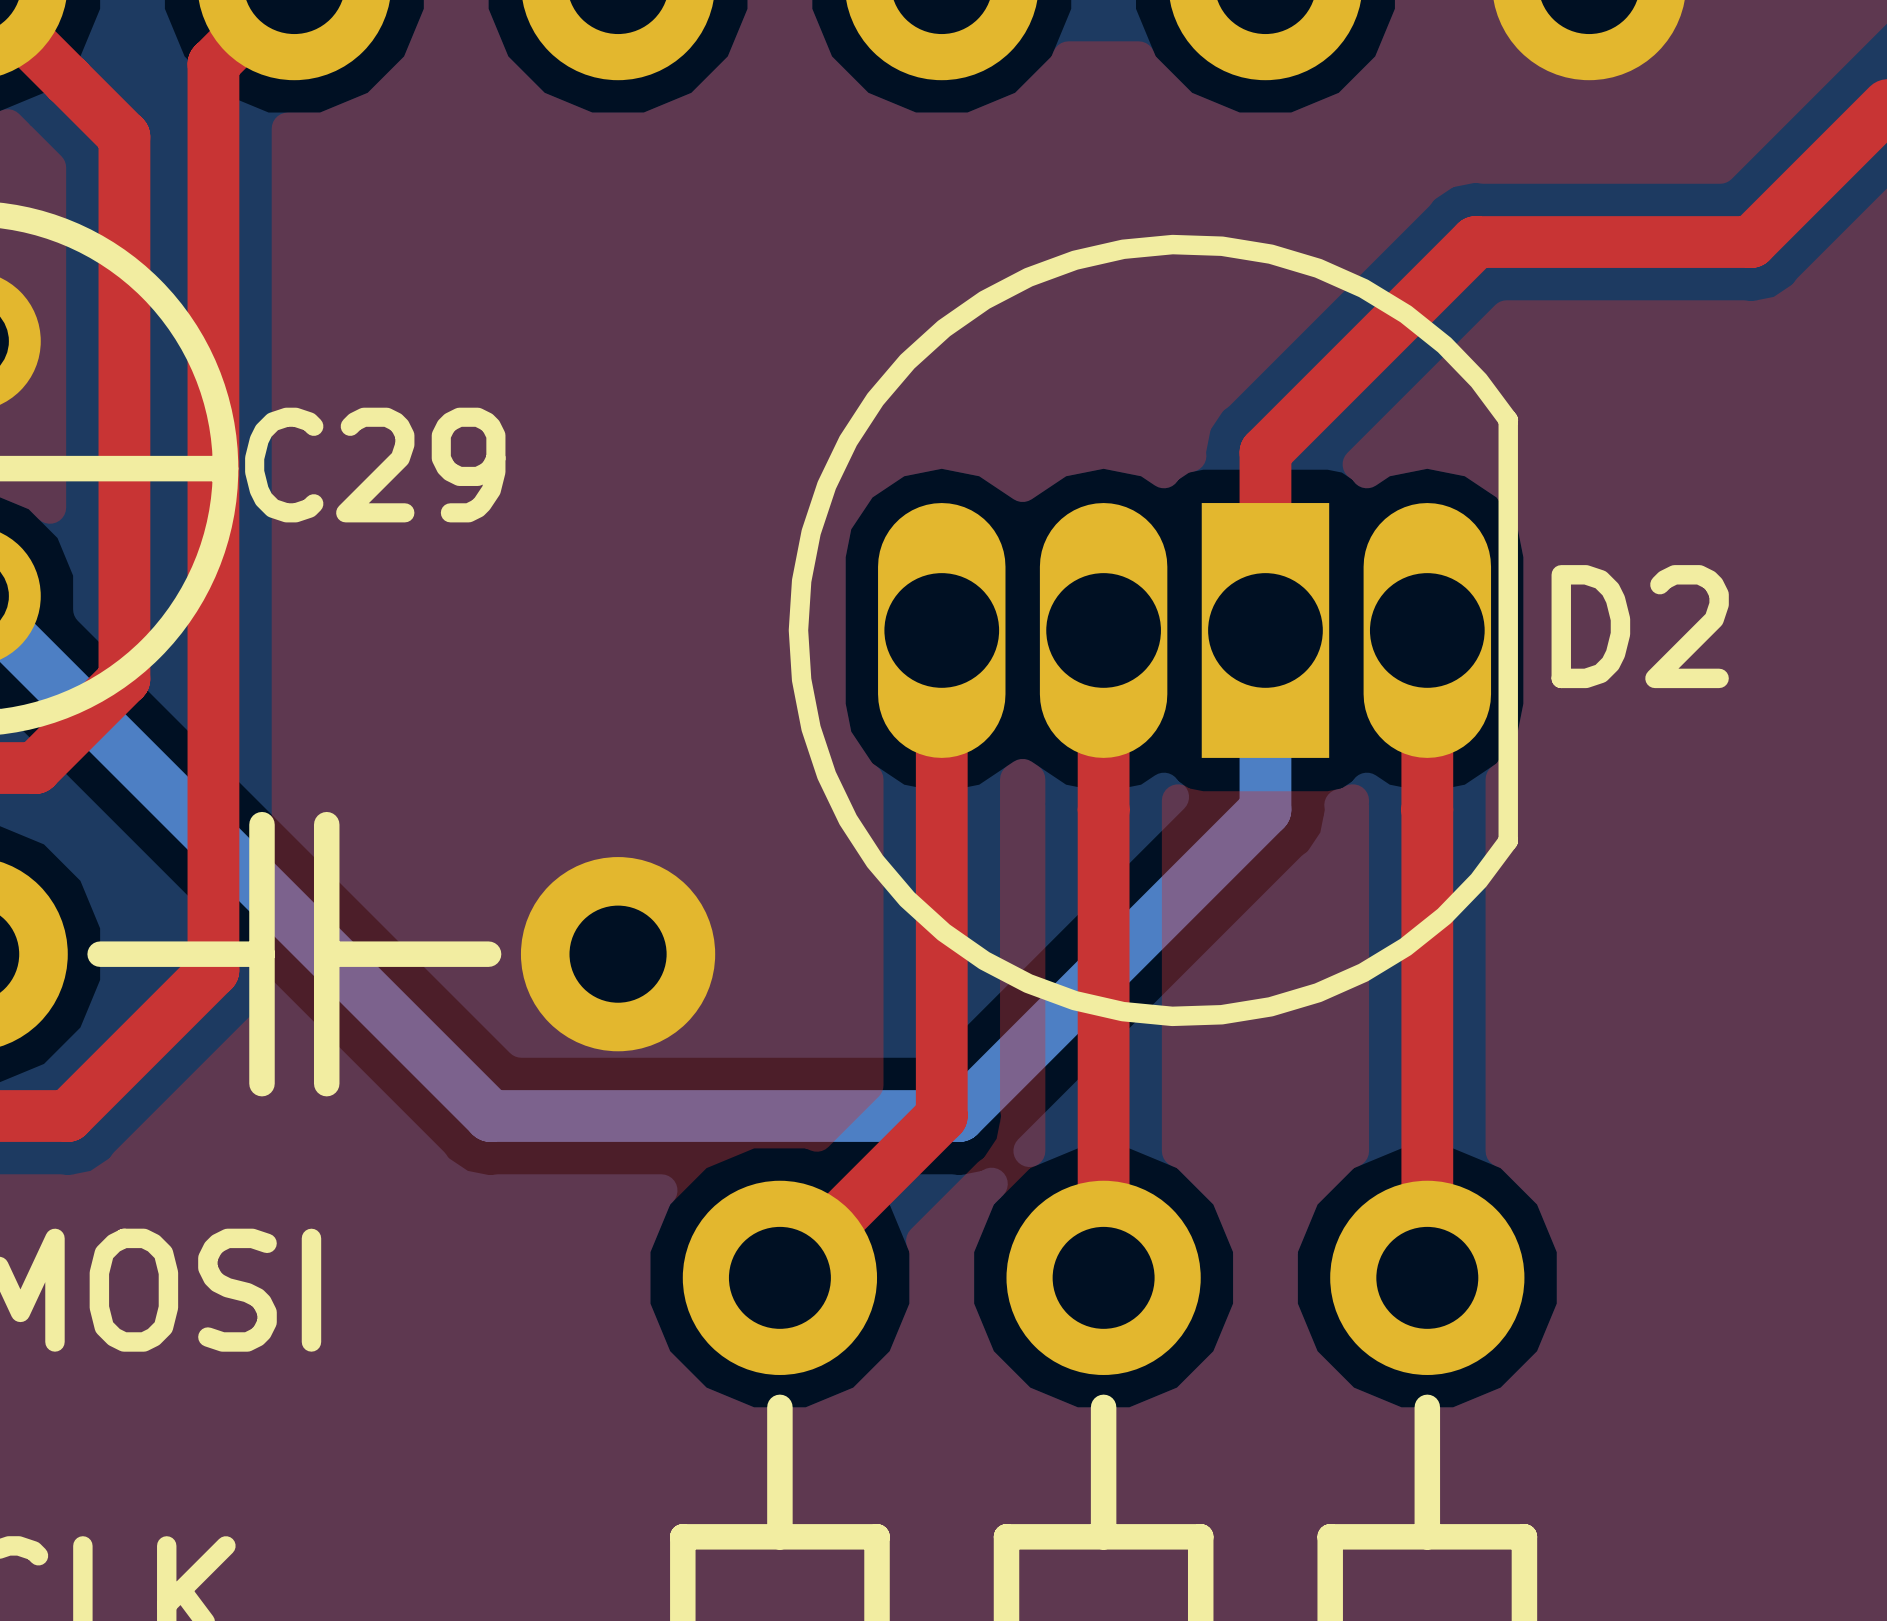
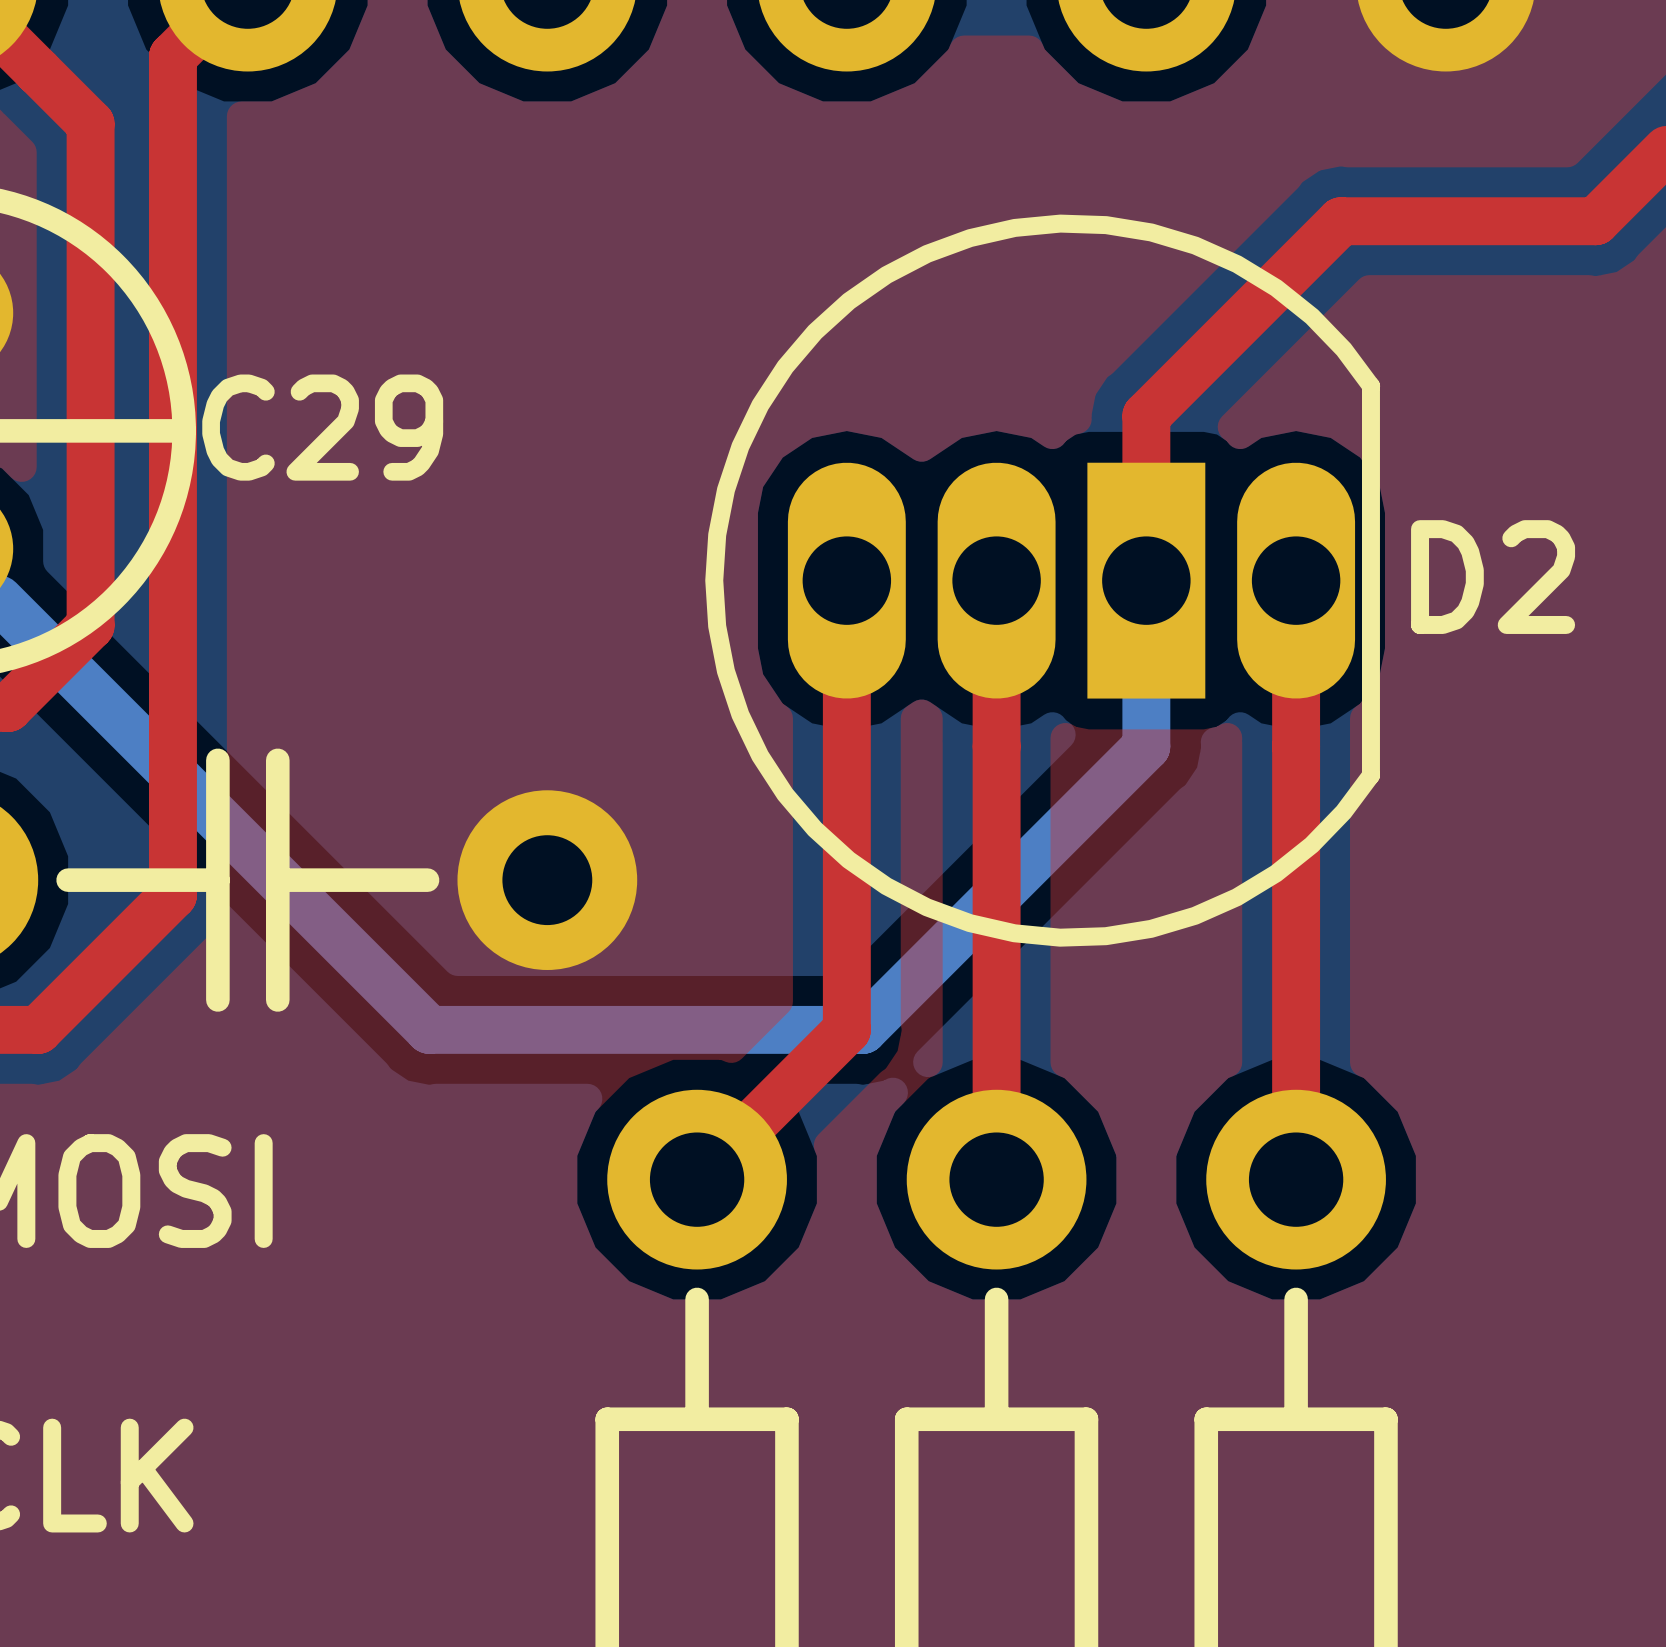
D2 footprint: [788, 234, 1519, 1027] -> [705, 214, 1381, 947]

